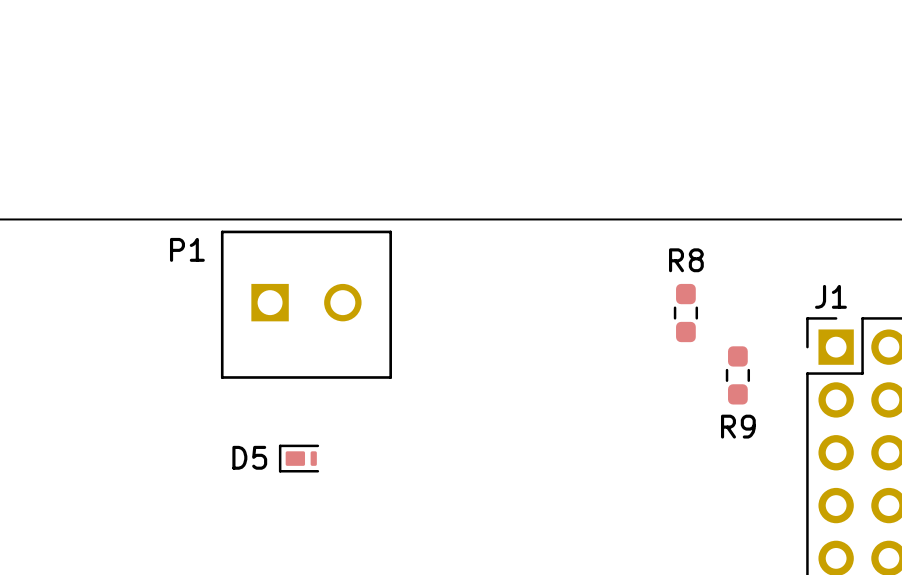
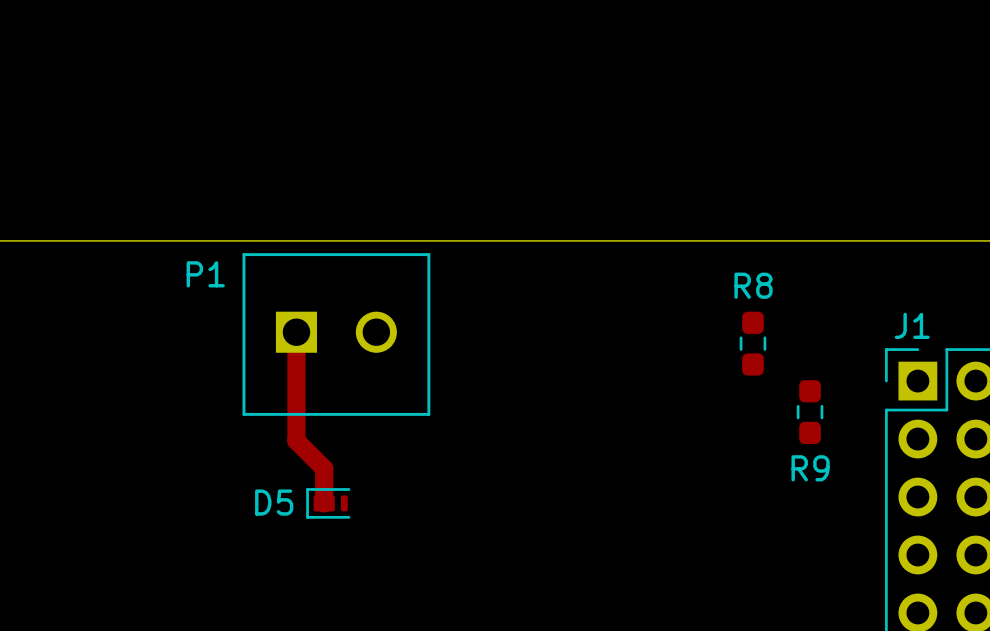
track: none -> (296, 332) (296, 440) (324, 468) (324, 503)

